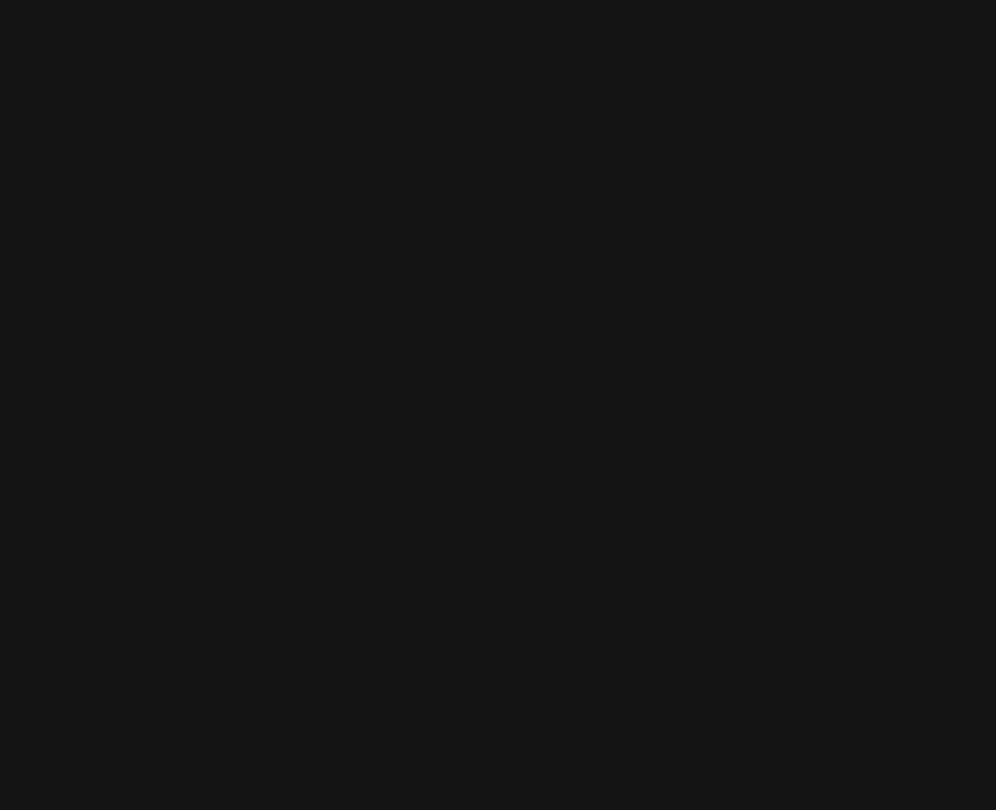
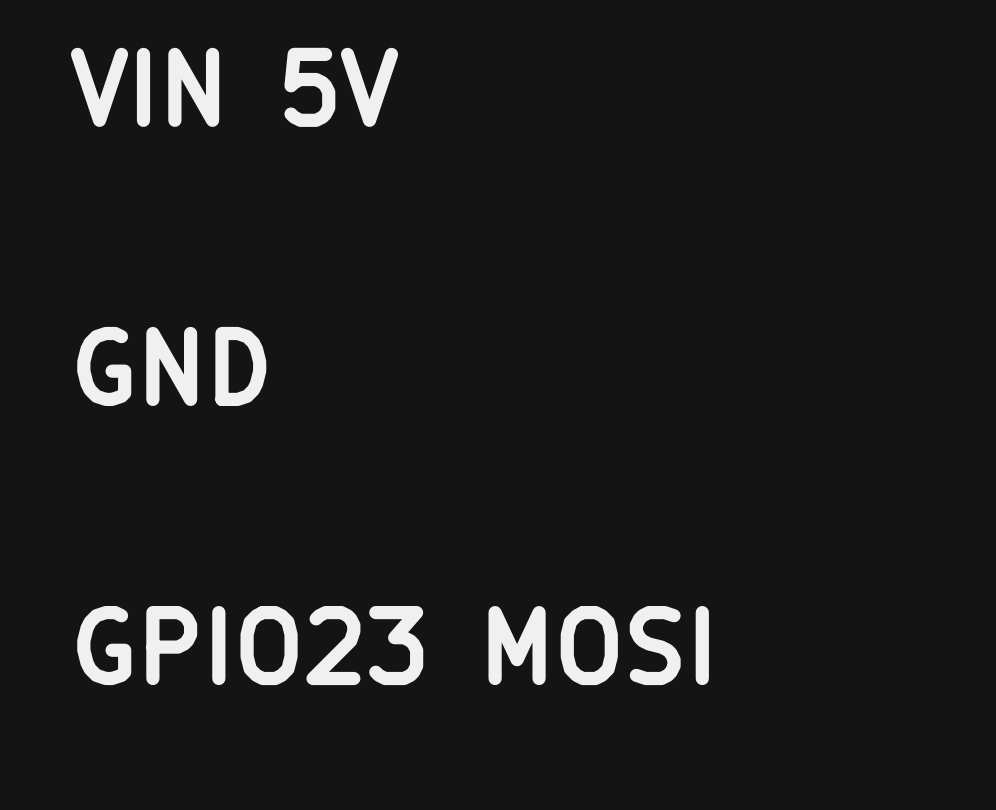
text: none -> VIN 5V (234, 87)
text: none -> GND (171, 366)
text: none -> GPIO23 MOSI (393, 645)

